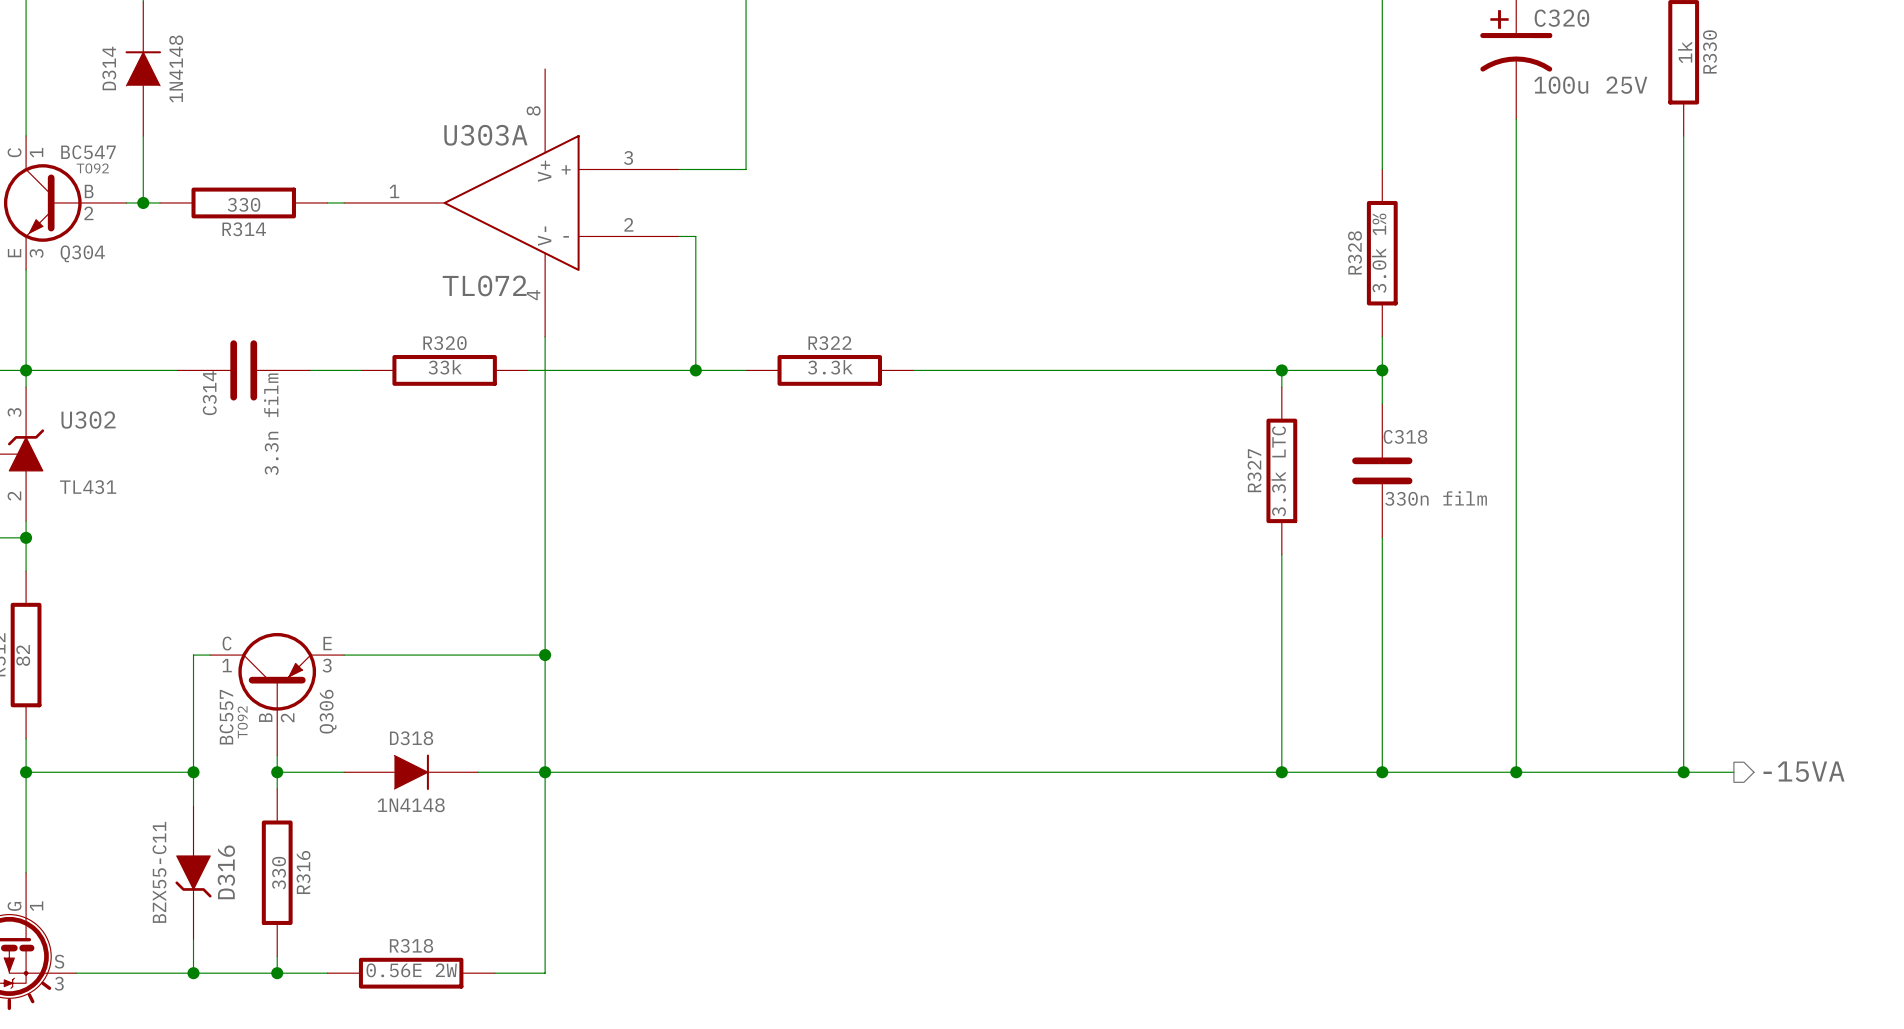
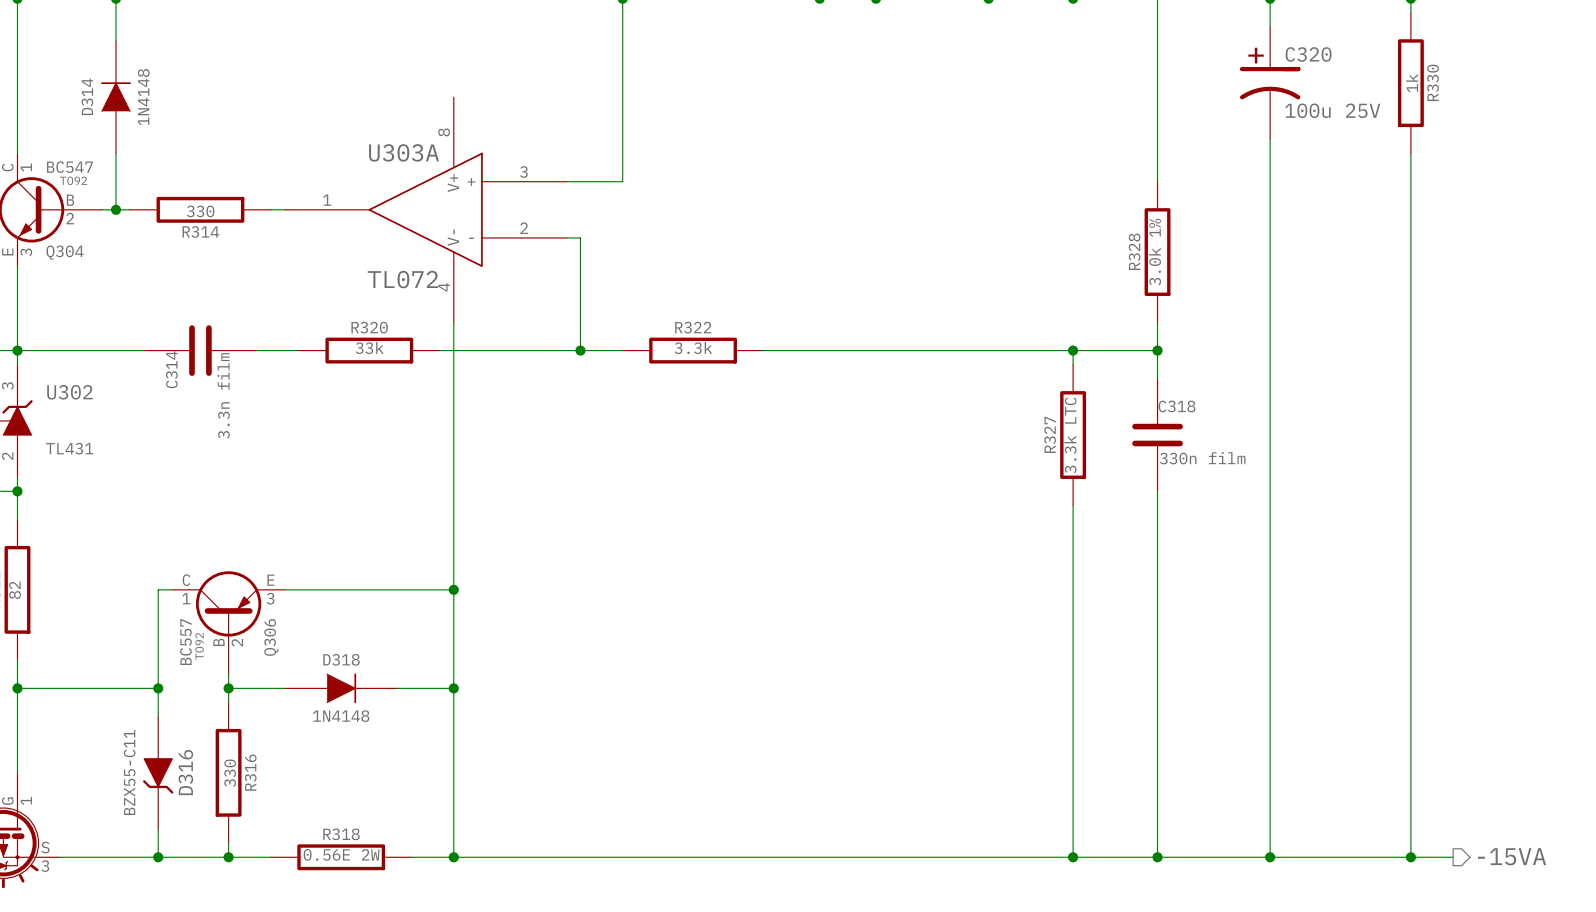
hierarchical label position: -15VA (1804, 771) -> -15VA (1512, 856)
wire: (545, 772) (1733, 772) -> (453, 857) (1453, 857)
wire: none -> (1073, 688) (1073, 857)
junction: (1281, 772) -> none
wire: none -> (1157, 688) (1157, 857)
junction: (1382, 772) -> none
wire: none -> (1270, 688) (1270, 857)
junction: (1516, 772) -> none
wire: none -> (1410, 688) (1410, 857)
junction: (1683, 772) -> none
junction: none -> (453, 857)
junction: none -> (1073, 857)
junction: none -> (1157, 857)
junction: none -> (1270, 857)
junction: none -> (1410, 857)

